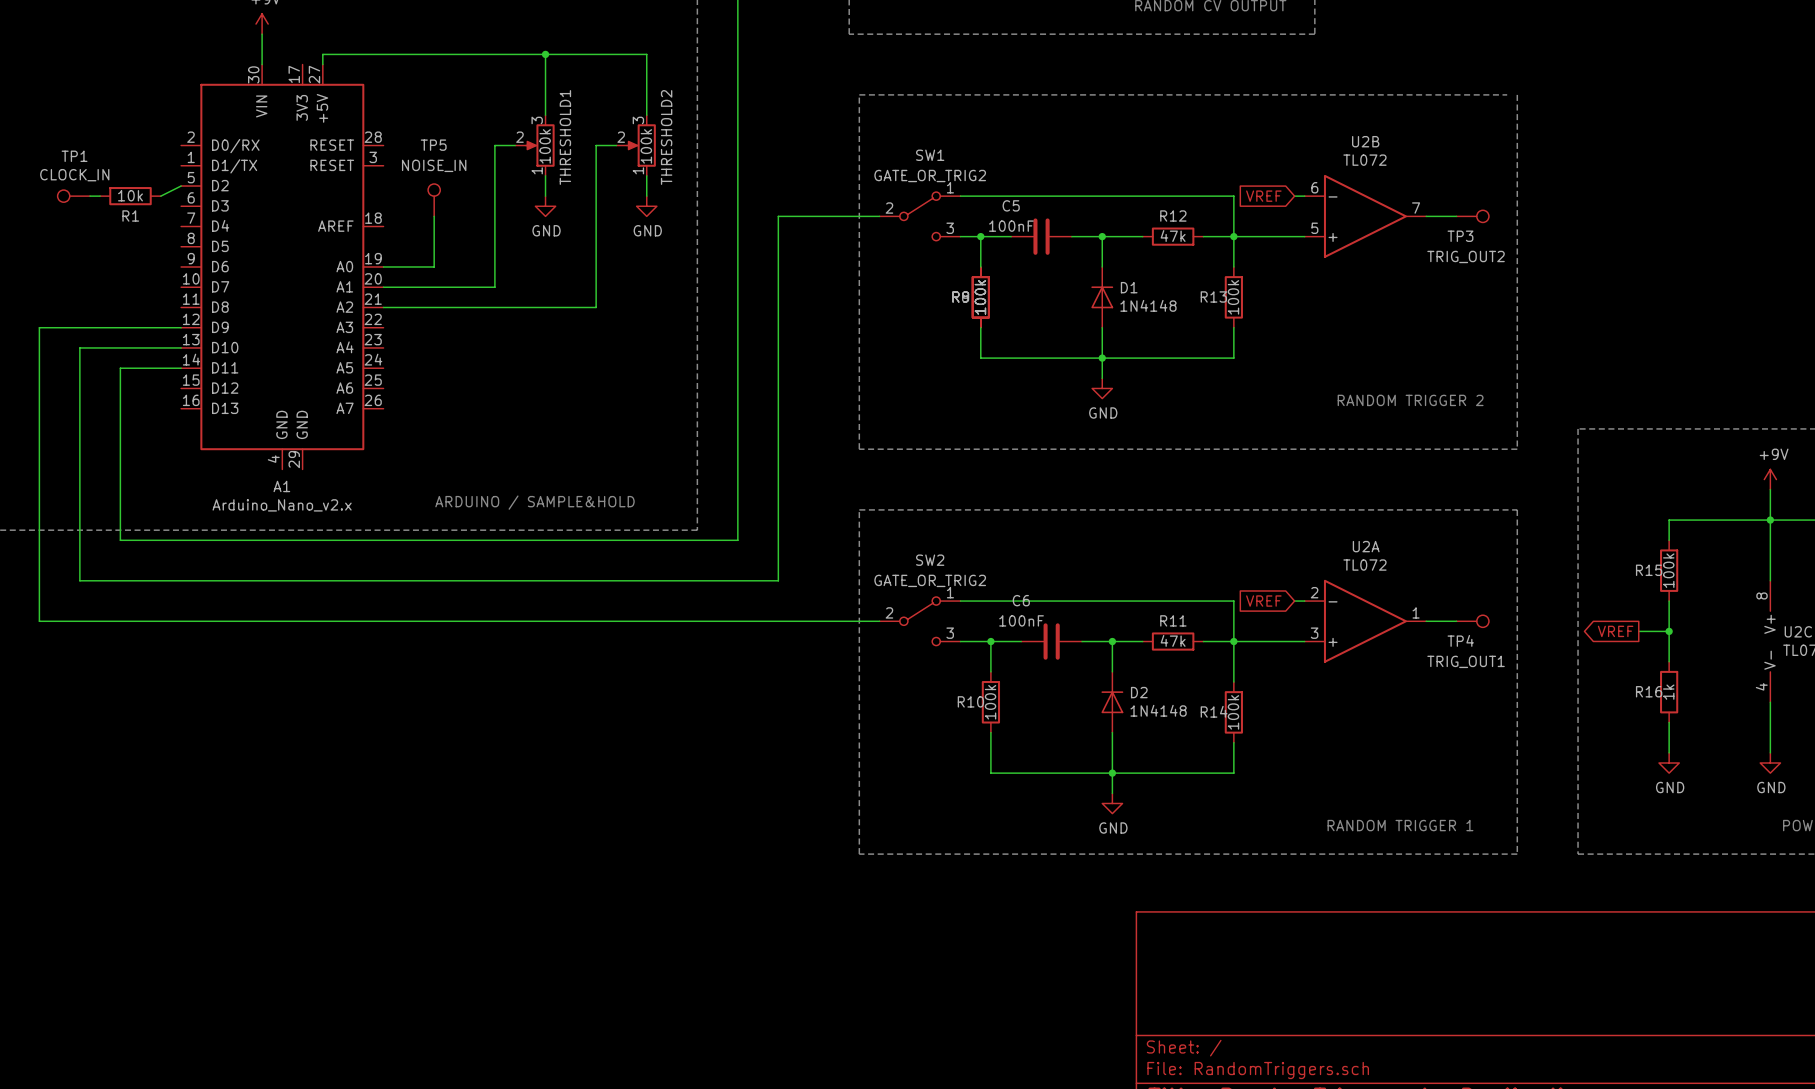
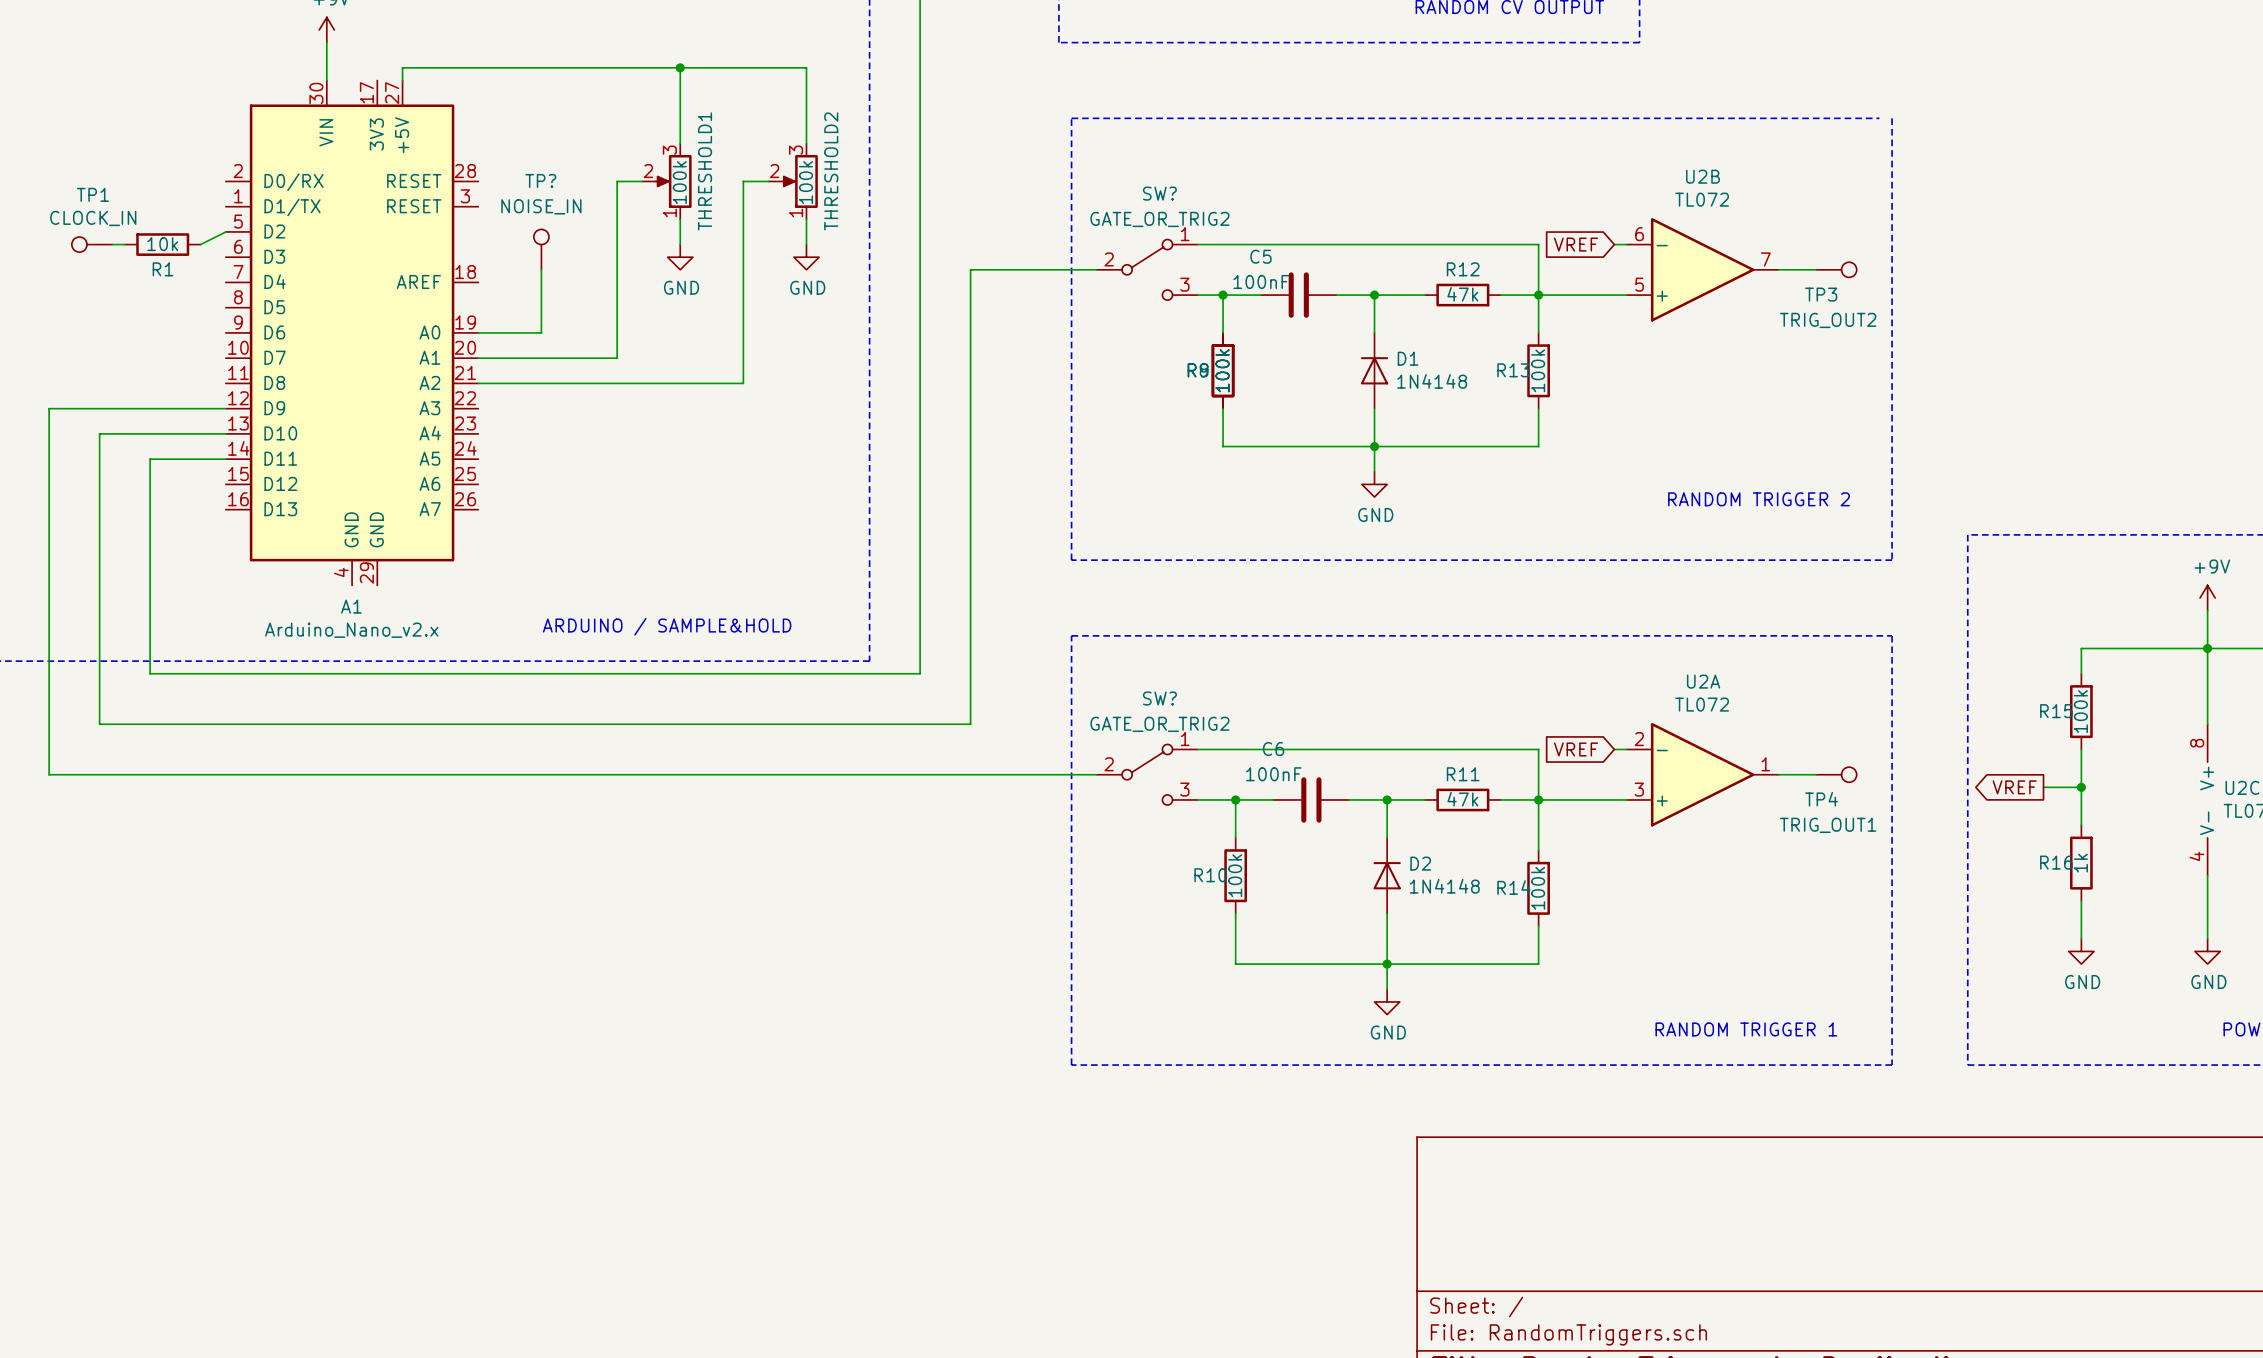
TP5 name: TP5 (433, 145) -> TP? (540, 180)
SW1 name: SW1 (930, 155) -> SW? (1159, 193)
SW2 name: SW2 (930, 560) -> SW? (1159, 698)

